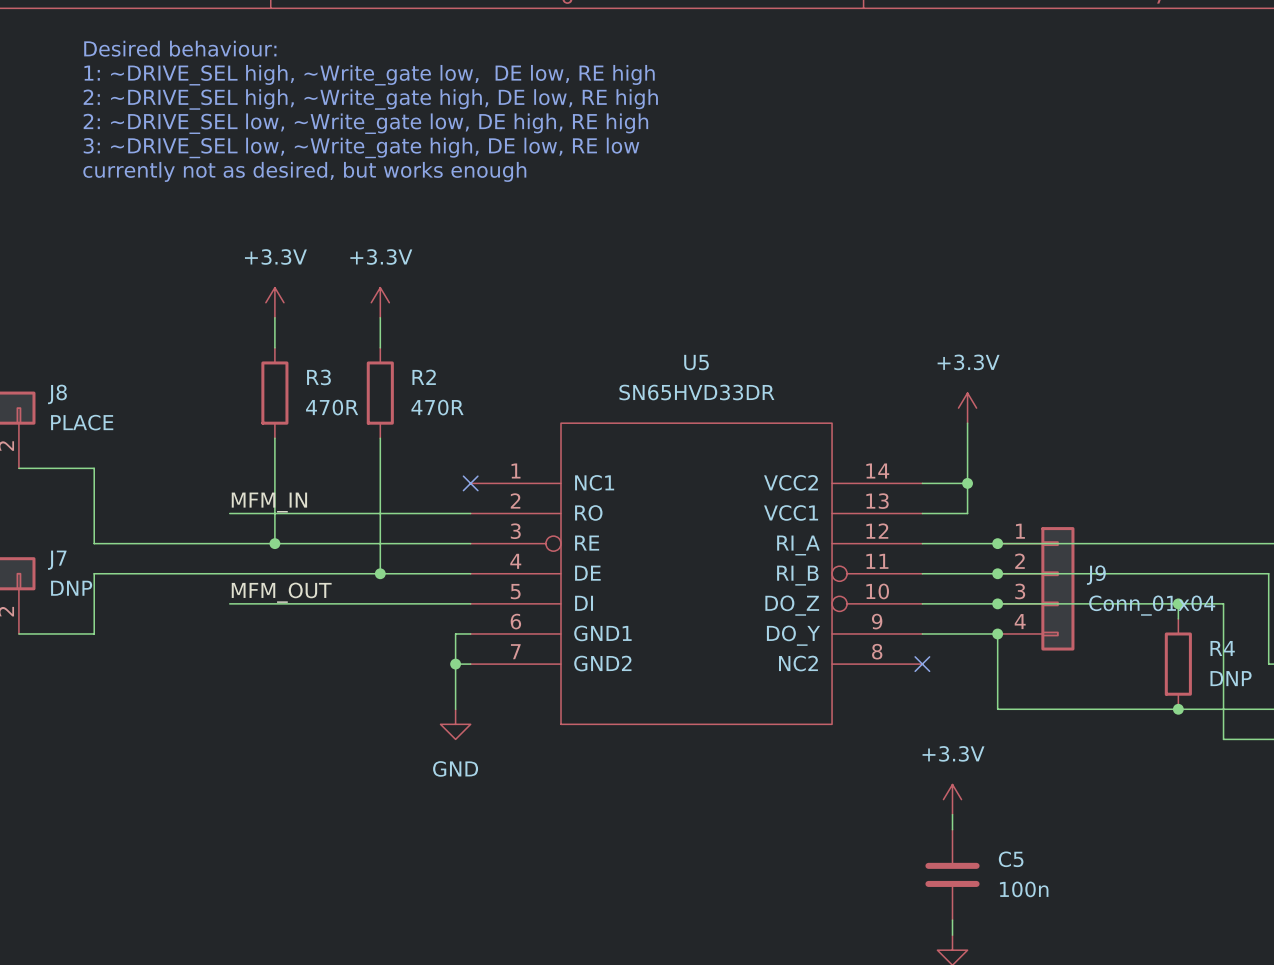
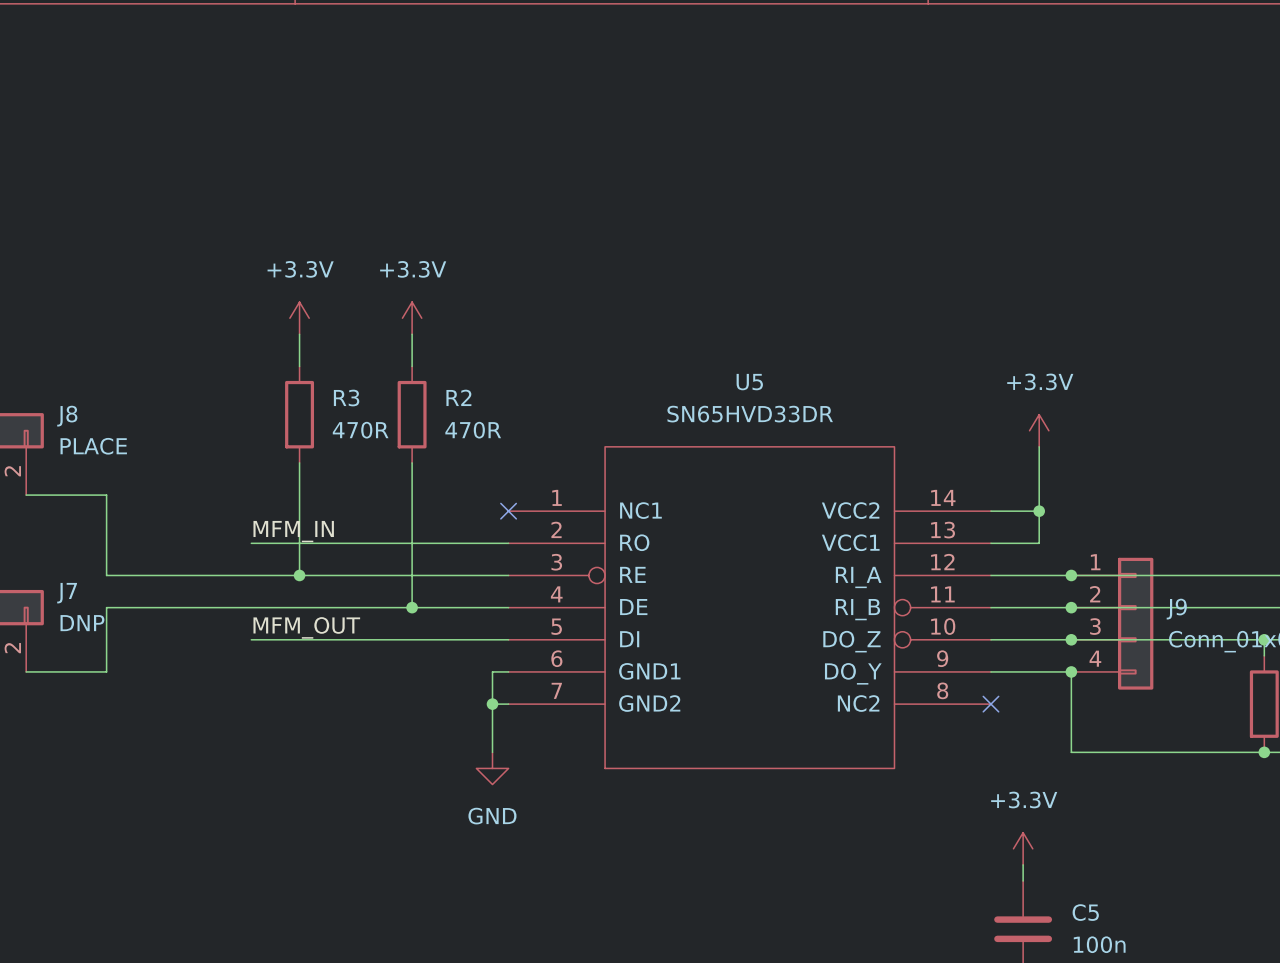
text: Desired behaviour: (180, 48) -> none
text: 1: ~DRIVE_SEL high, ~Write_gate low, DE low, RE high (369, 75) -> none
text: 2: ~DRIVE_SEL high, ~Write_gate high, DE low, RE high (370, 99) -> none
text: 2: ~DRIVE_SEL low, ~Write_gate low, DE high, RE high (365, 123) -> none
text: 3: ~DRIVE_SEL low, ~Write_gate high, DE low, RE low (361, 147) -> none
text: currently not as desired, but works enough (304, 171) -> none

